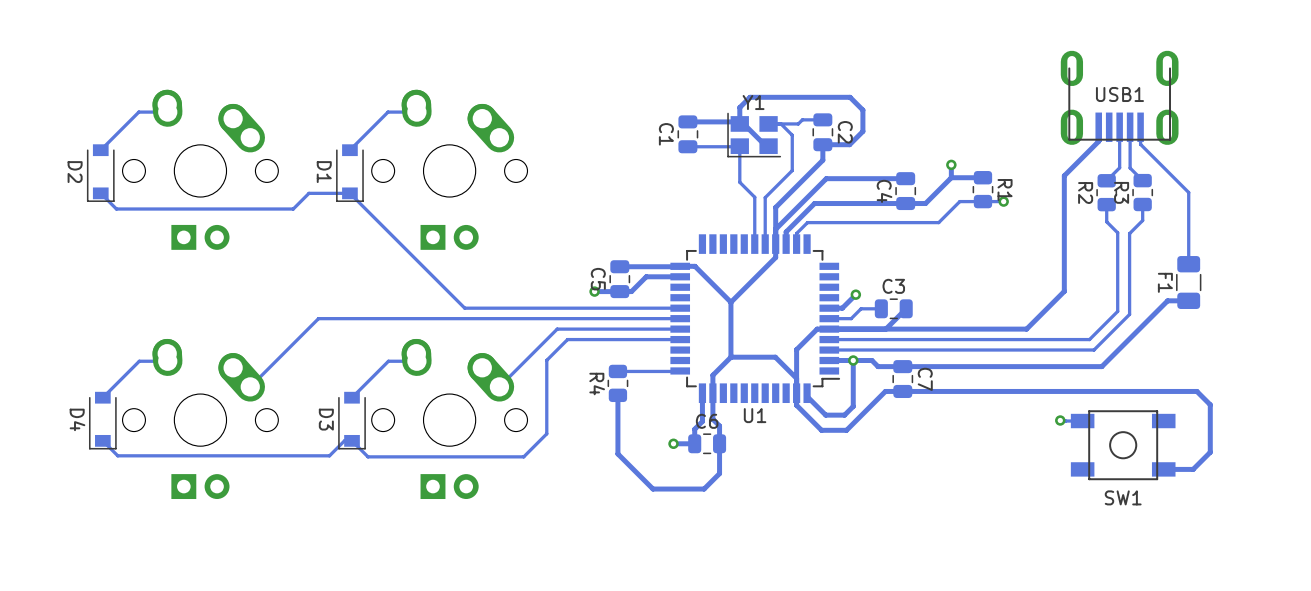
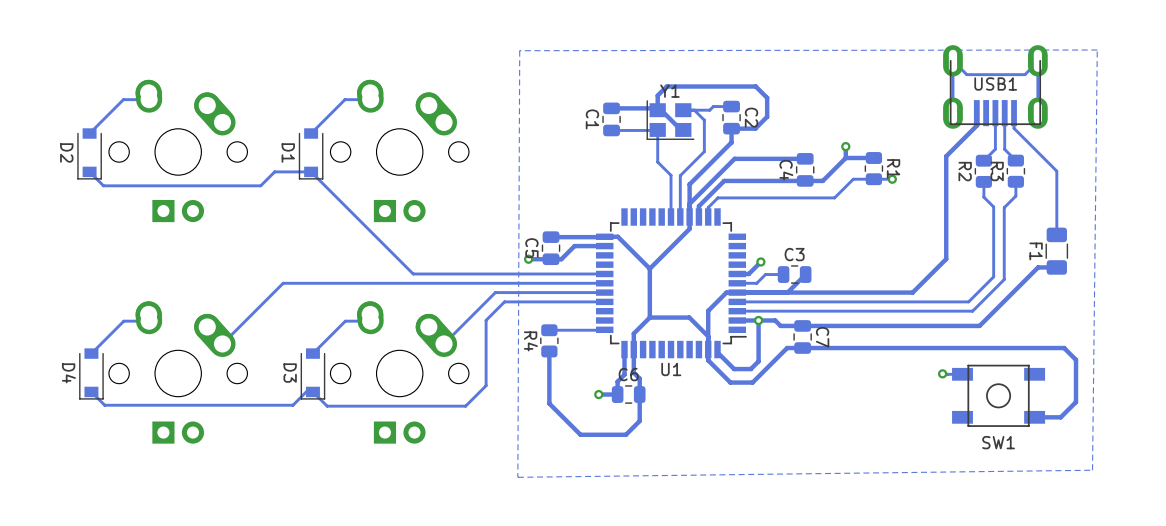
zone outline: none -> (1097, 50) (1092, 470) (517, 477) (519, 50) (1097, 50)
track: none -> (1037, 60) (1037, 113)
track: none -> (1037, 61) (1024, 74) (966, 74) (952, 60) (952, 113)

